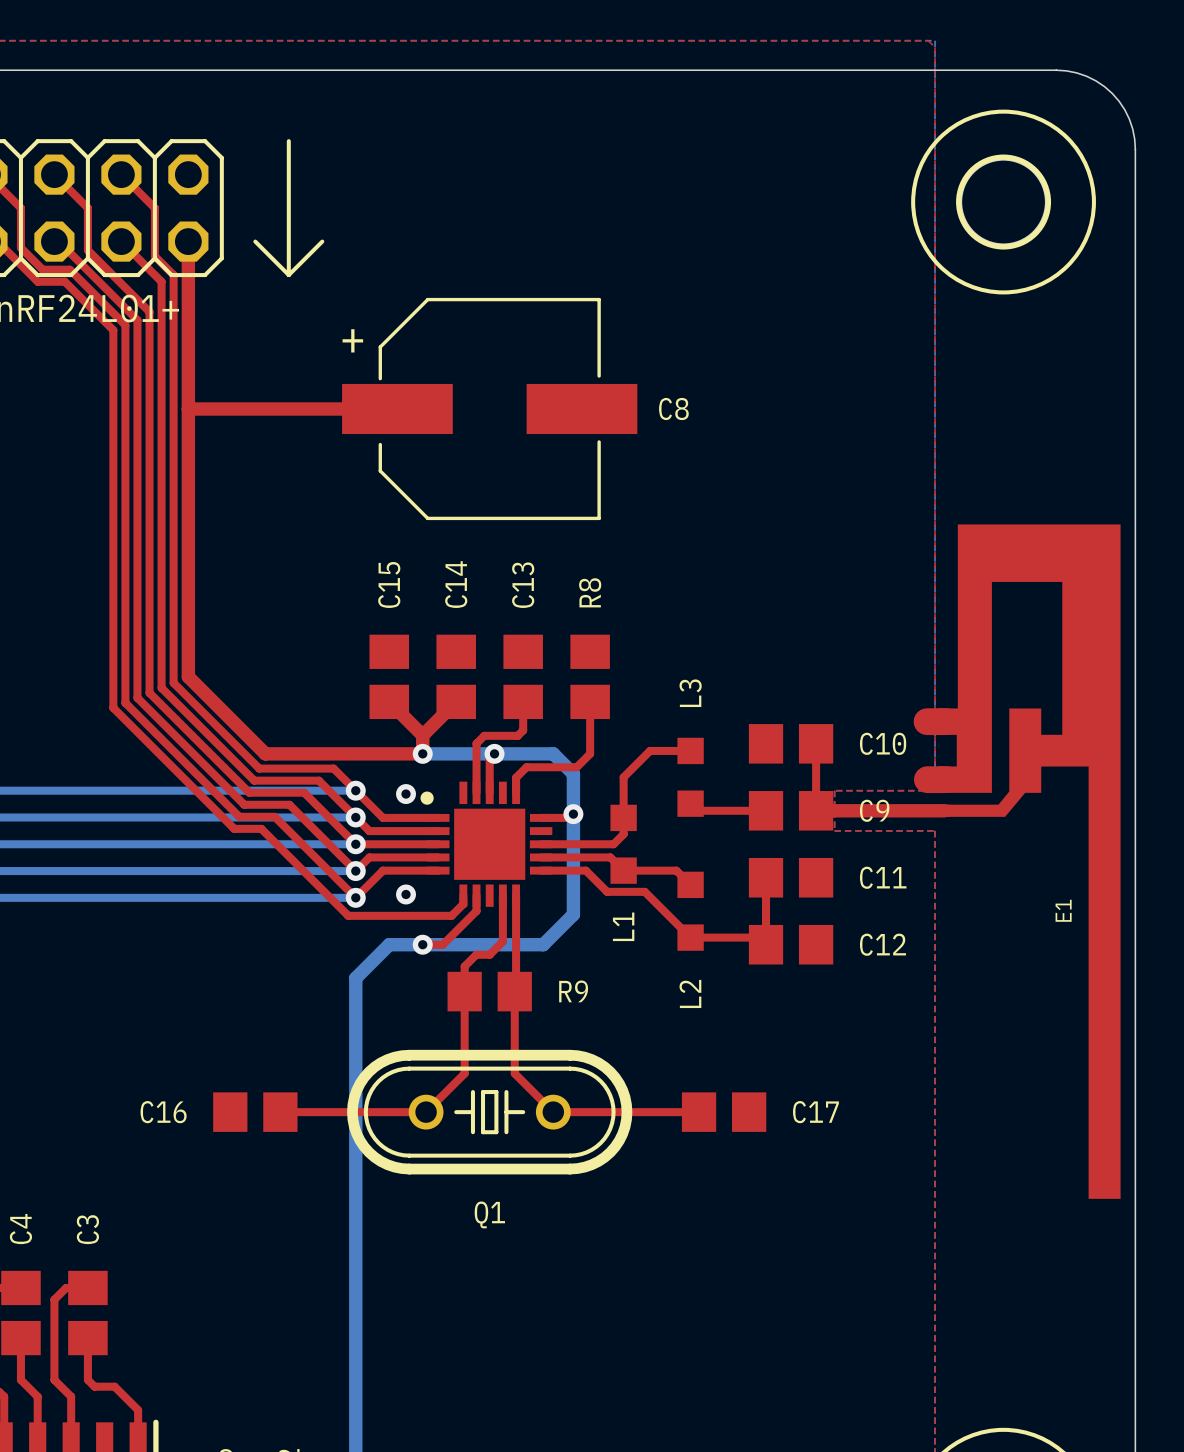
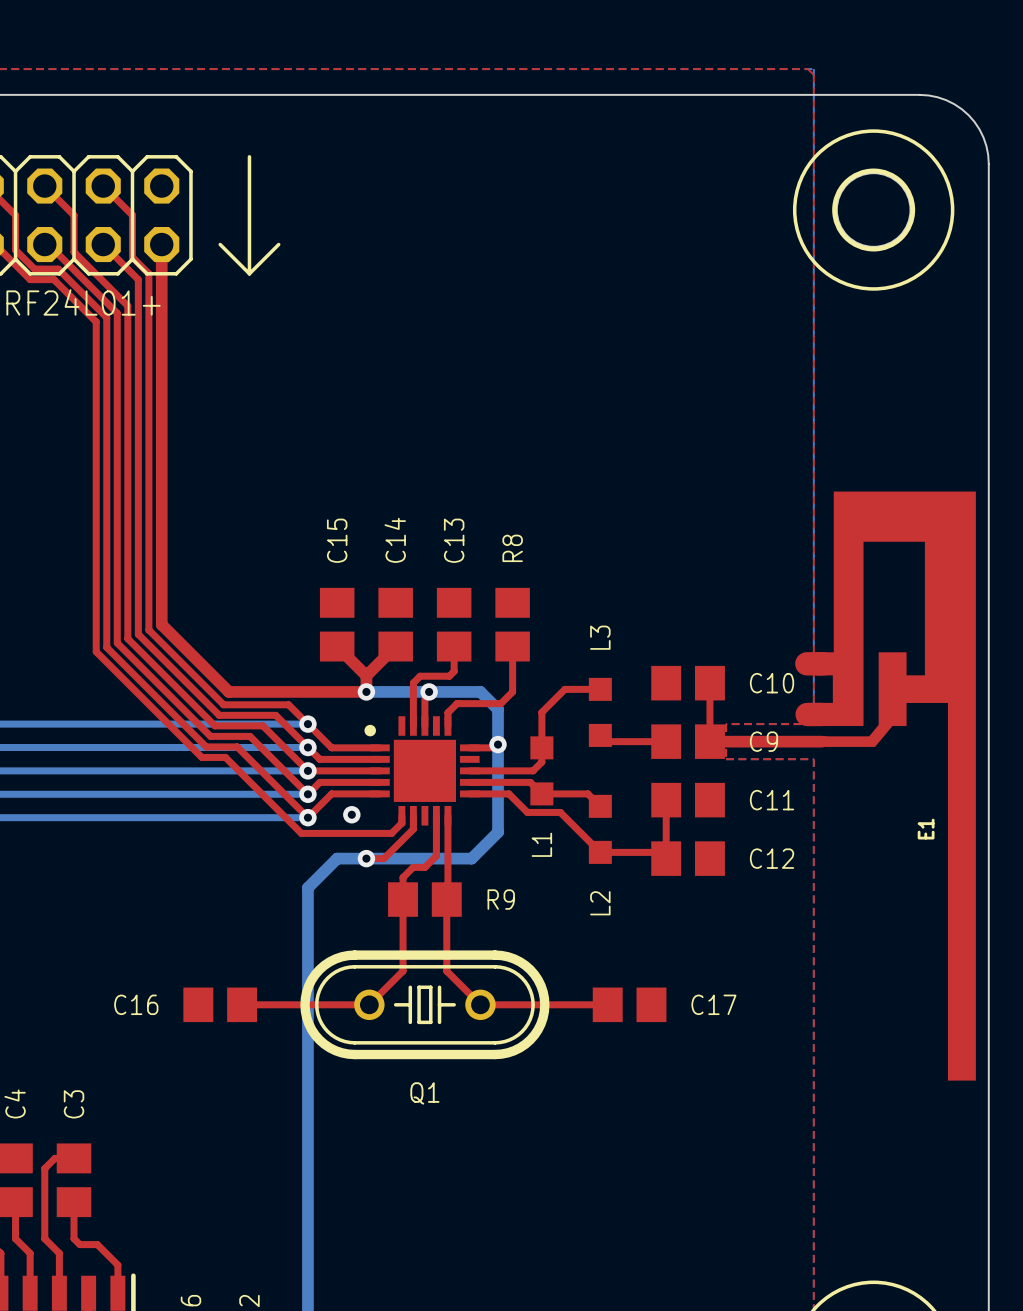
top track: (188, 408) (397, 408) -> none
C8: (489, 408) -> none
via: (406, 794) -> none

